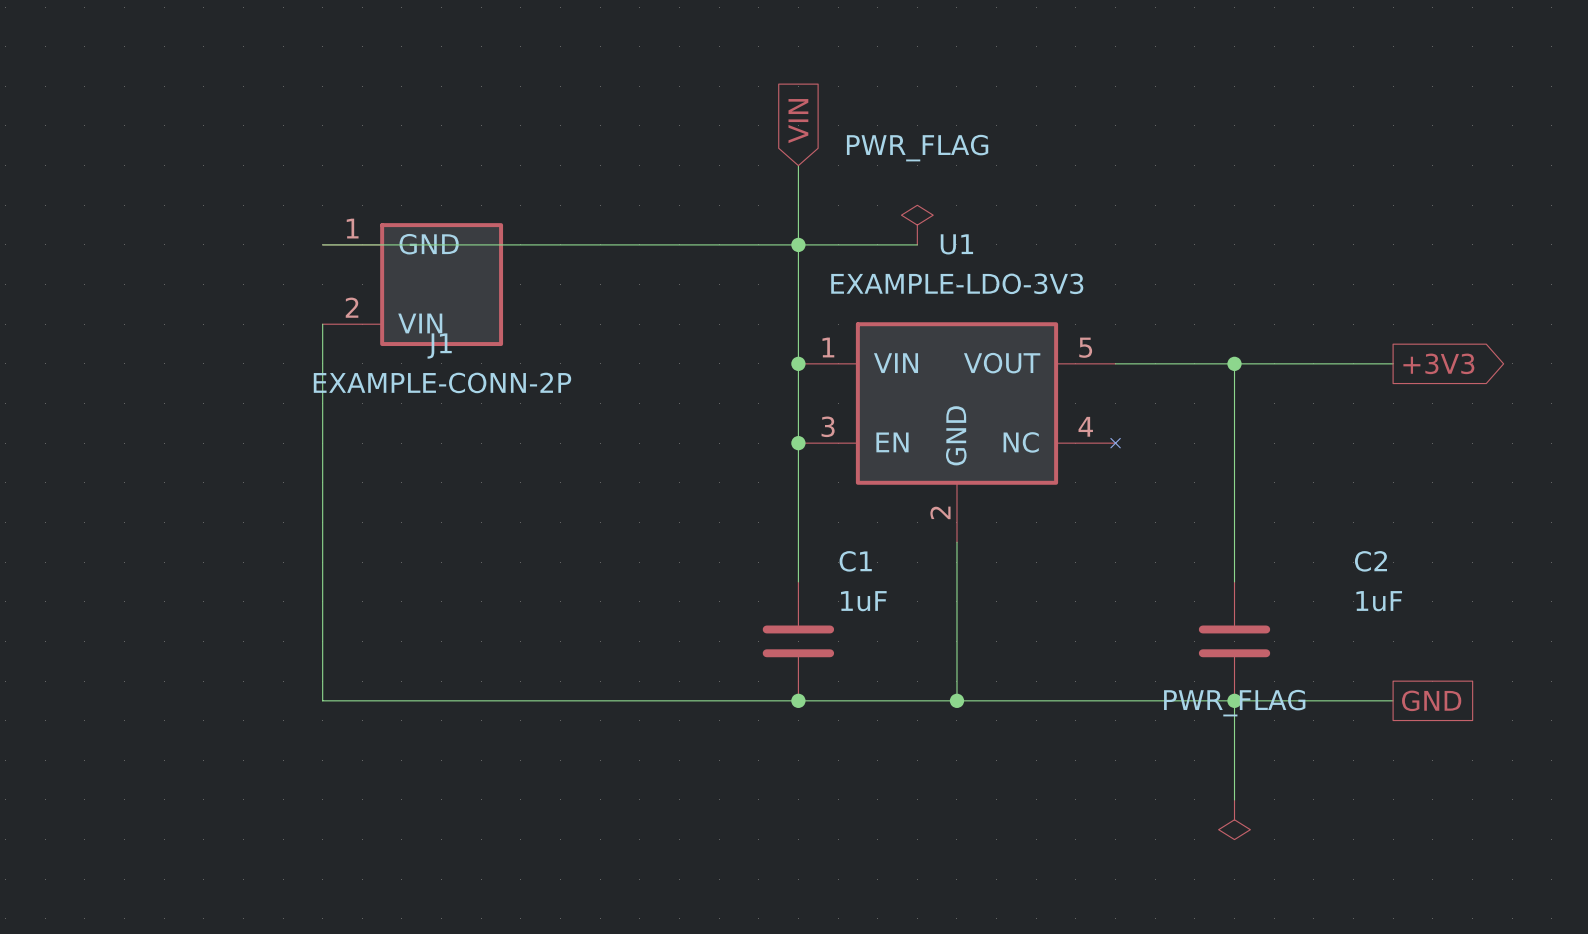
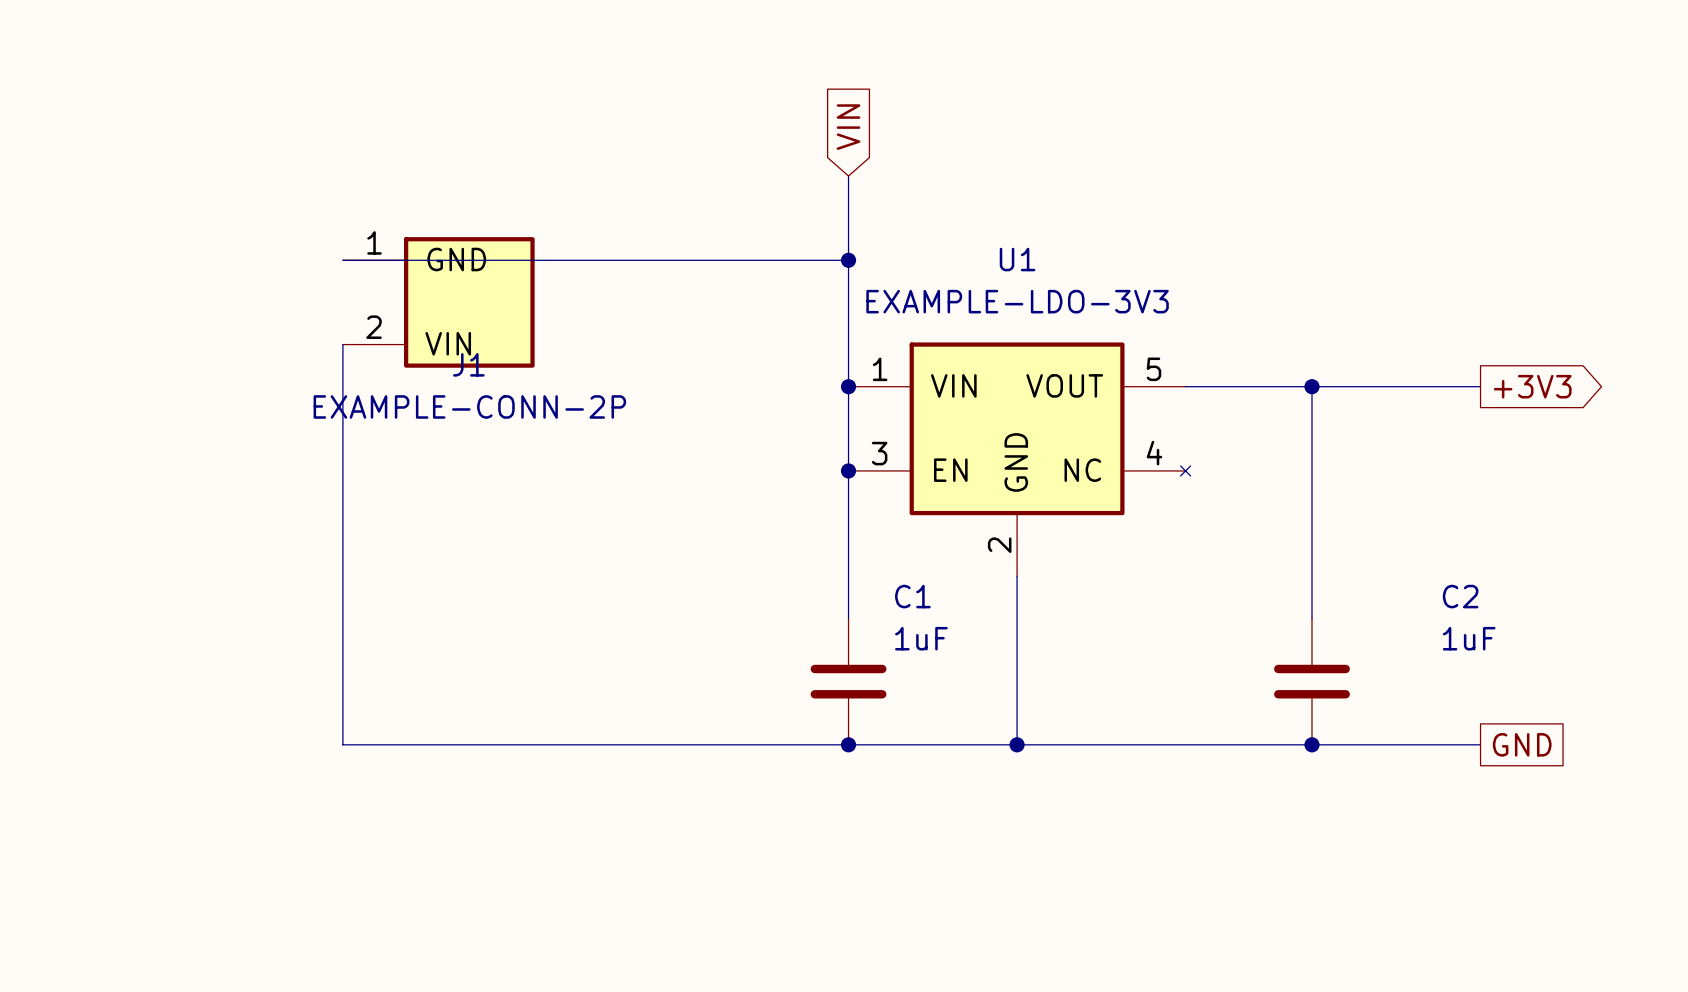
power symbol: PWR_FLAG (917, 225) -> none
wire: (798, 244) (917, 244) -> none
wire: (1234, 700) (1234, 799) -> none
power symbol: PWR_FLAG (1234, 819) -> none

